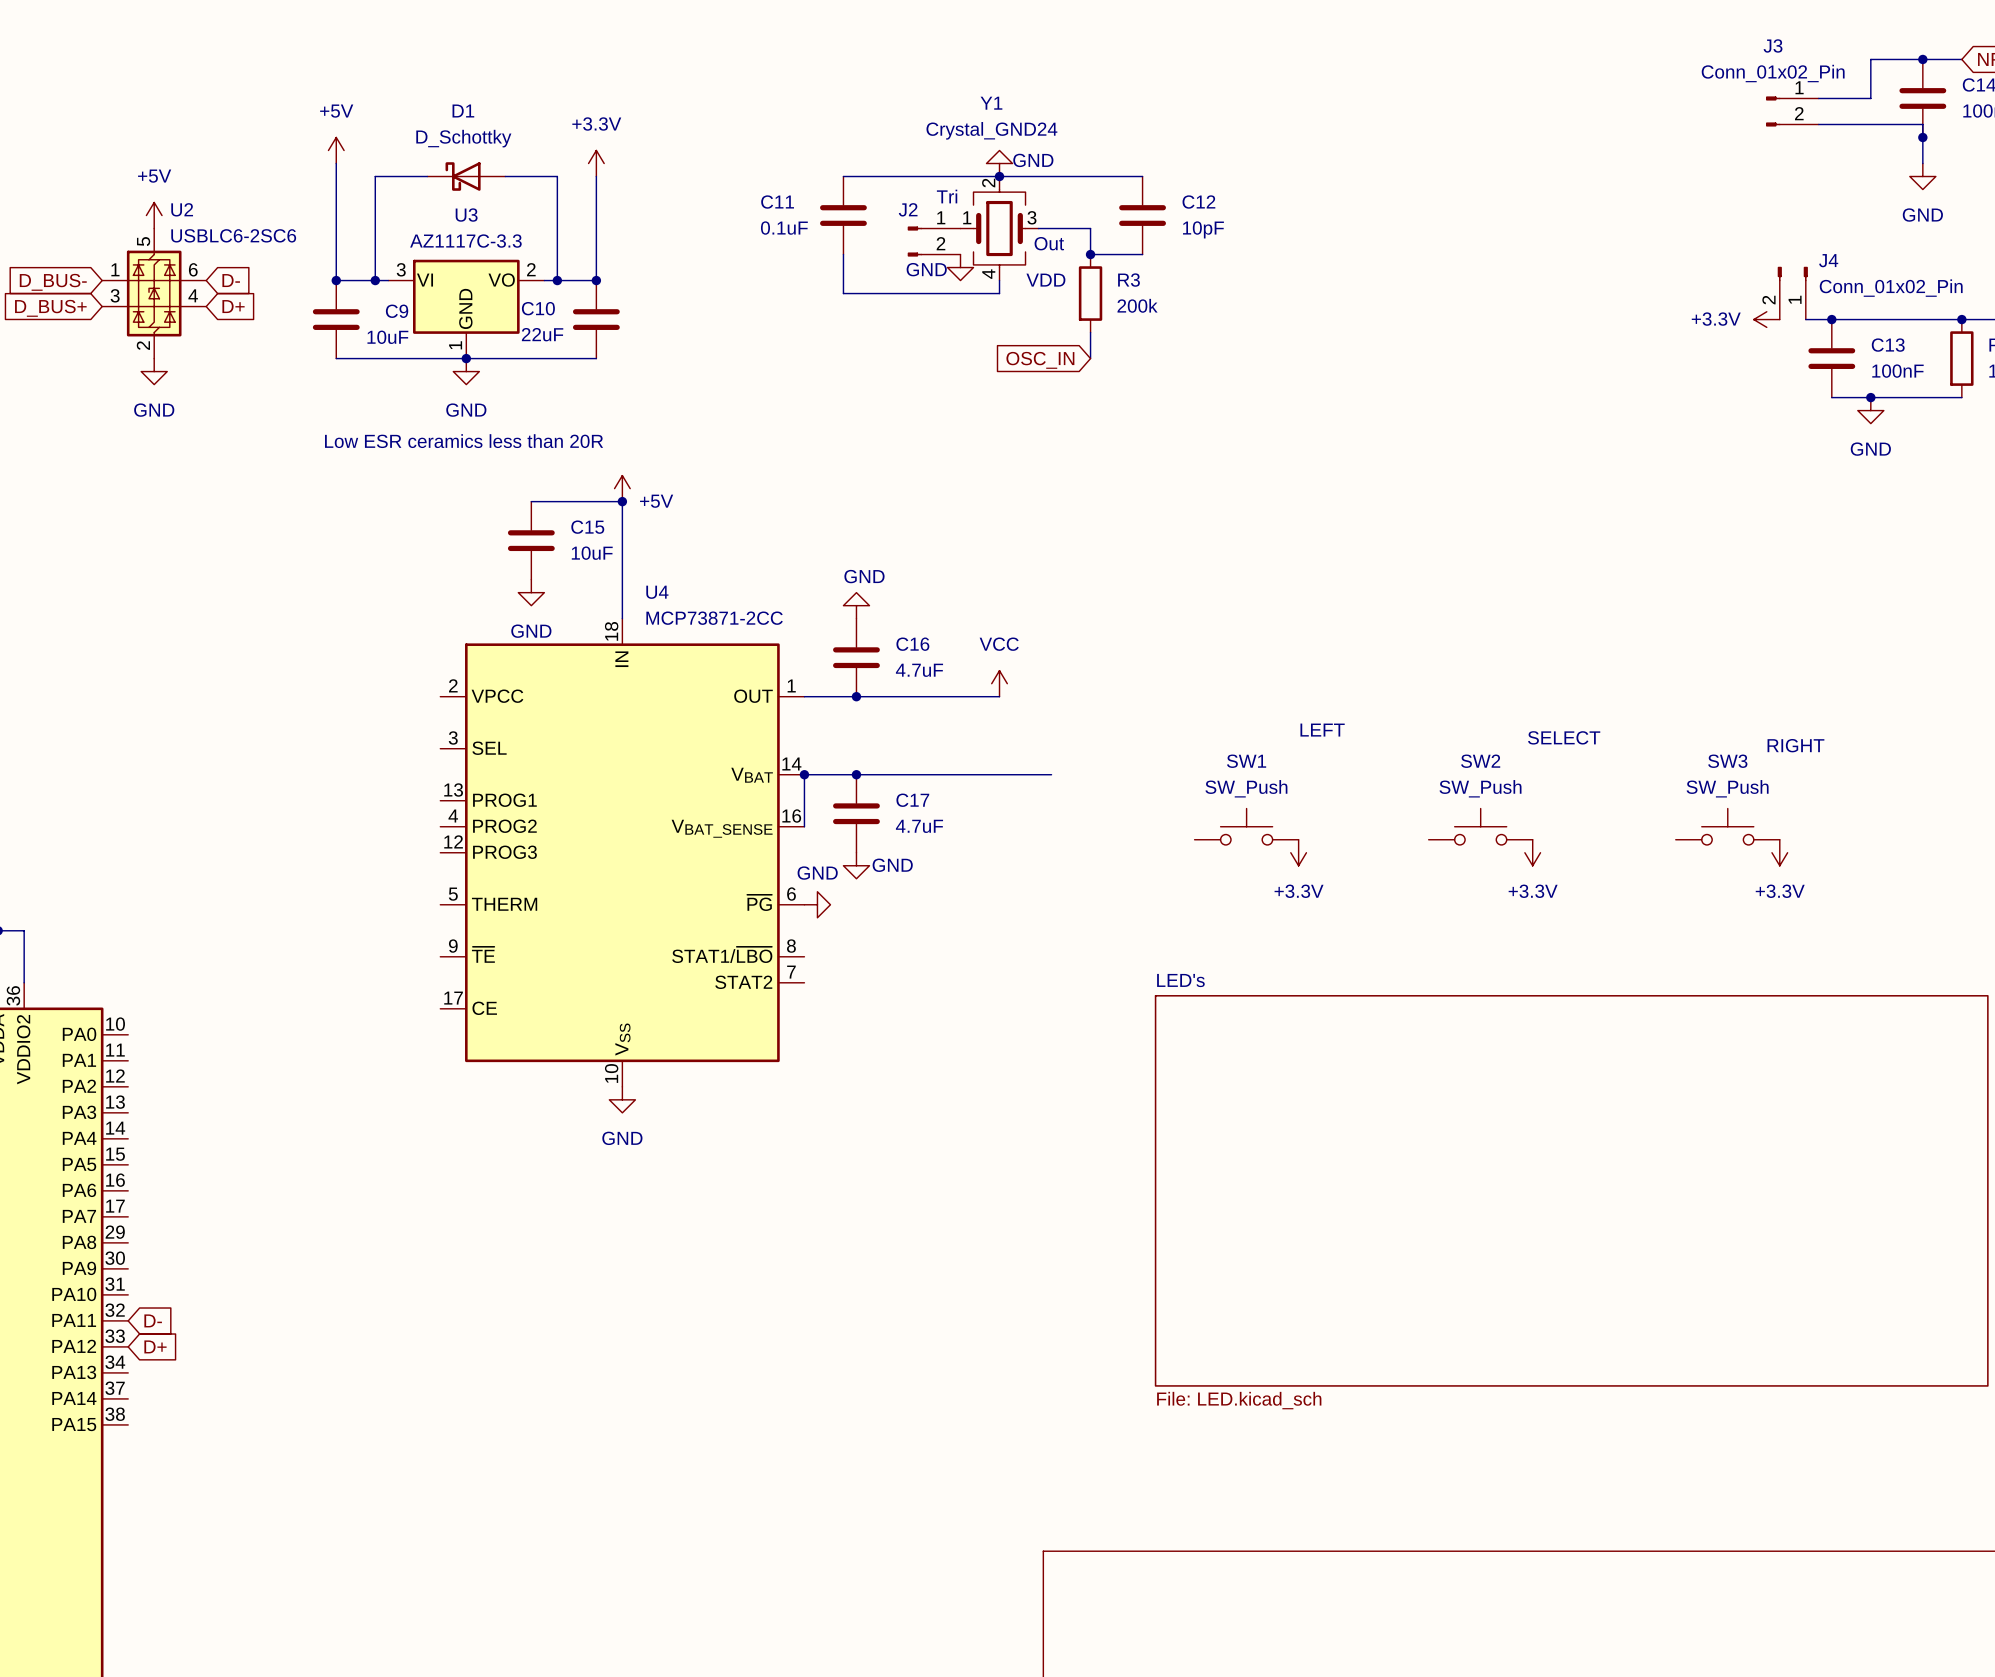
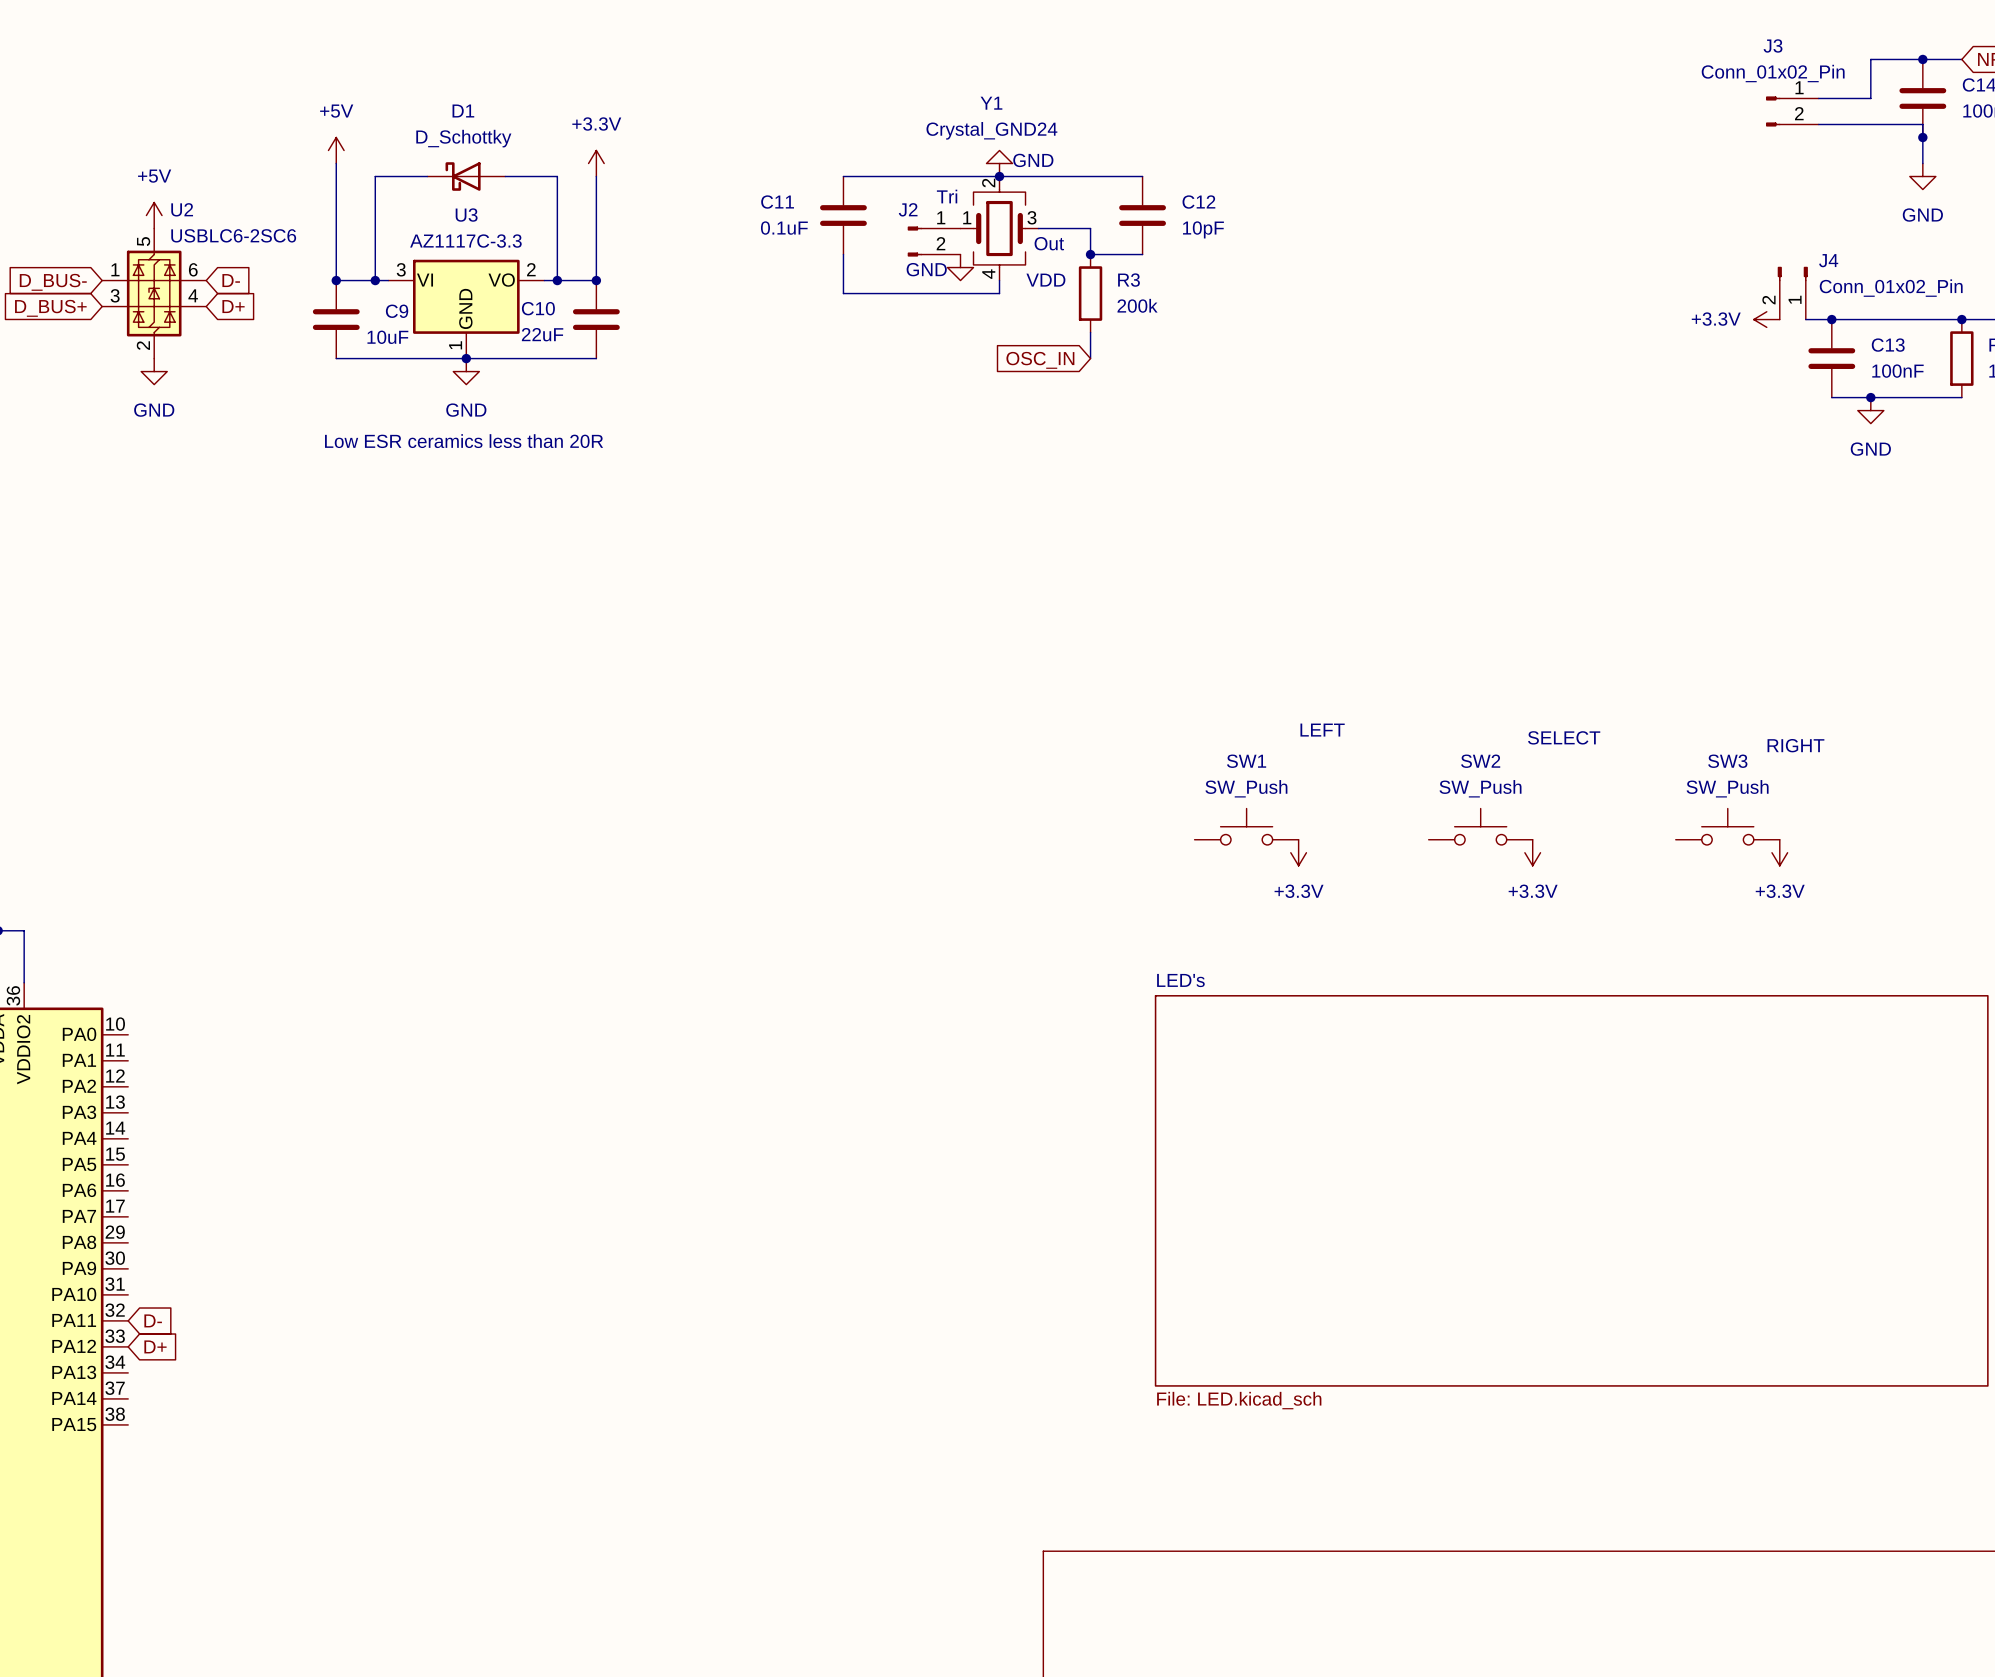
power symbol: +5V (622, 488) -> none
wire: (531, 501) (622, 501) (622, 618) -> none
junction: (622, 501) -> none
C15: 10uF (531, 540) -> none
power symbol: GND (531, 592) -> none
power symbol: GND (856, 605) -> none
C16: 4.7uF (856, 657) -> none
power symbol: VCC (999, 683) -> none
wire: (804, 696) (999, 696) -> none
junction: (856, 696) -> none
junction: (804, 774) -> none
junction: (856, 774) -> none
wire: (1051, 774) (804, 774) (804, 826) -> none
C17: 4.7uF (856, 813) -> none
U4: MCP73871-2CC (622, 852) -> none
power symbol: GND (856, 865) -> none
power symbol: GND (817, 904) -> none
power symbol: GND (622, 1099) -> none

